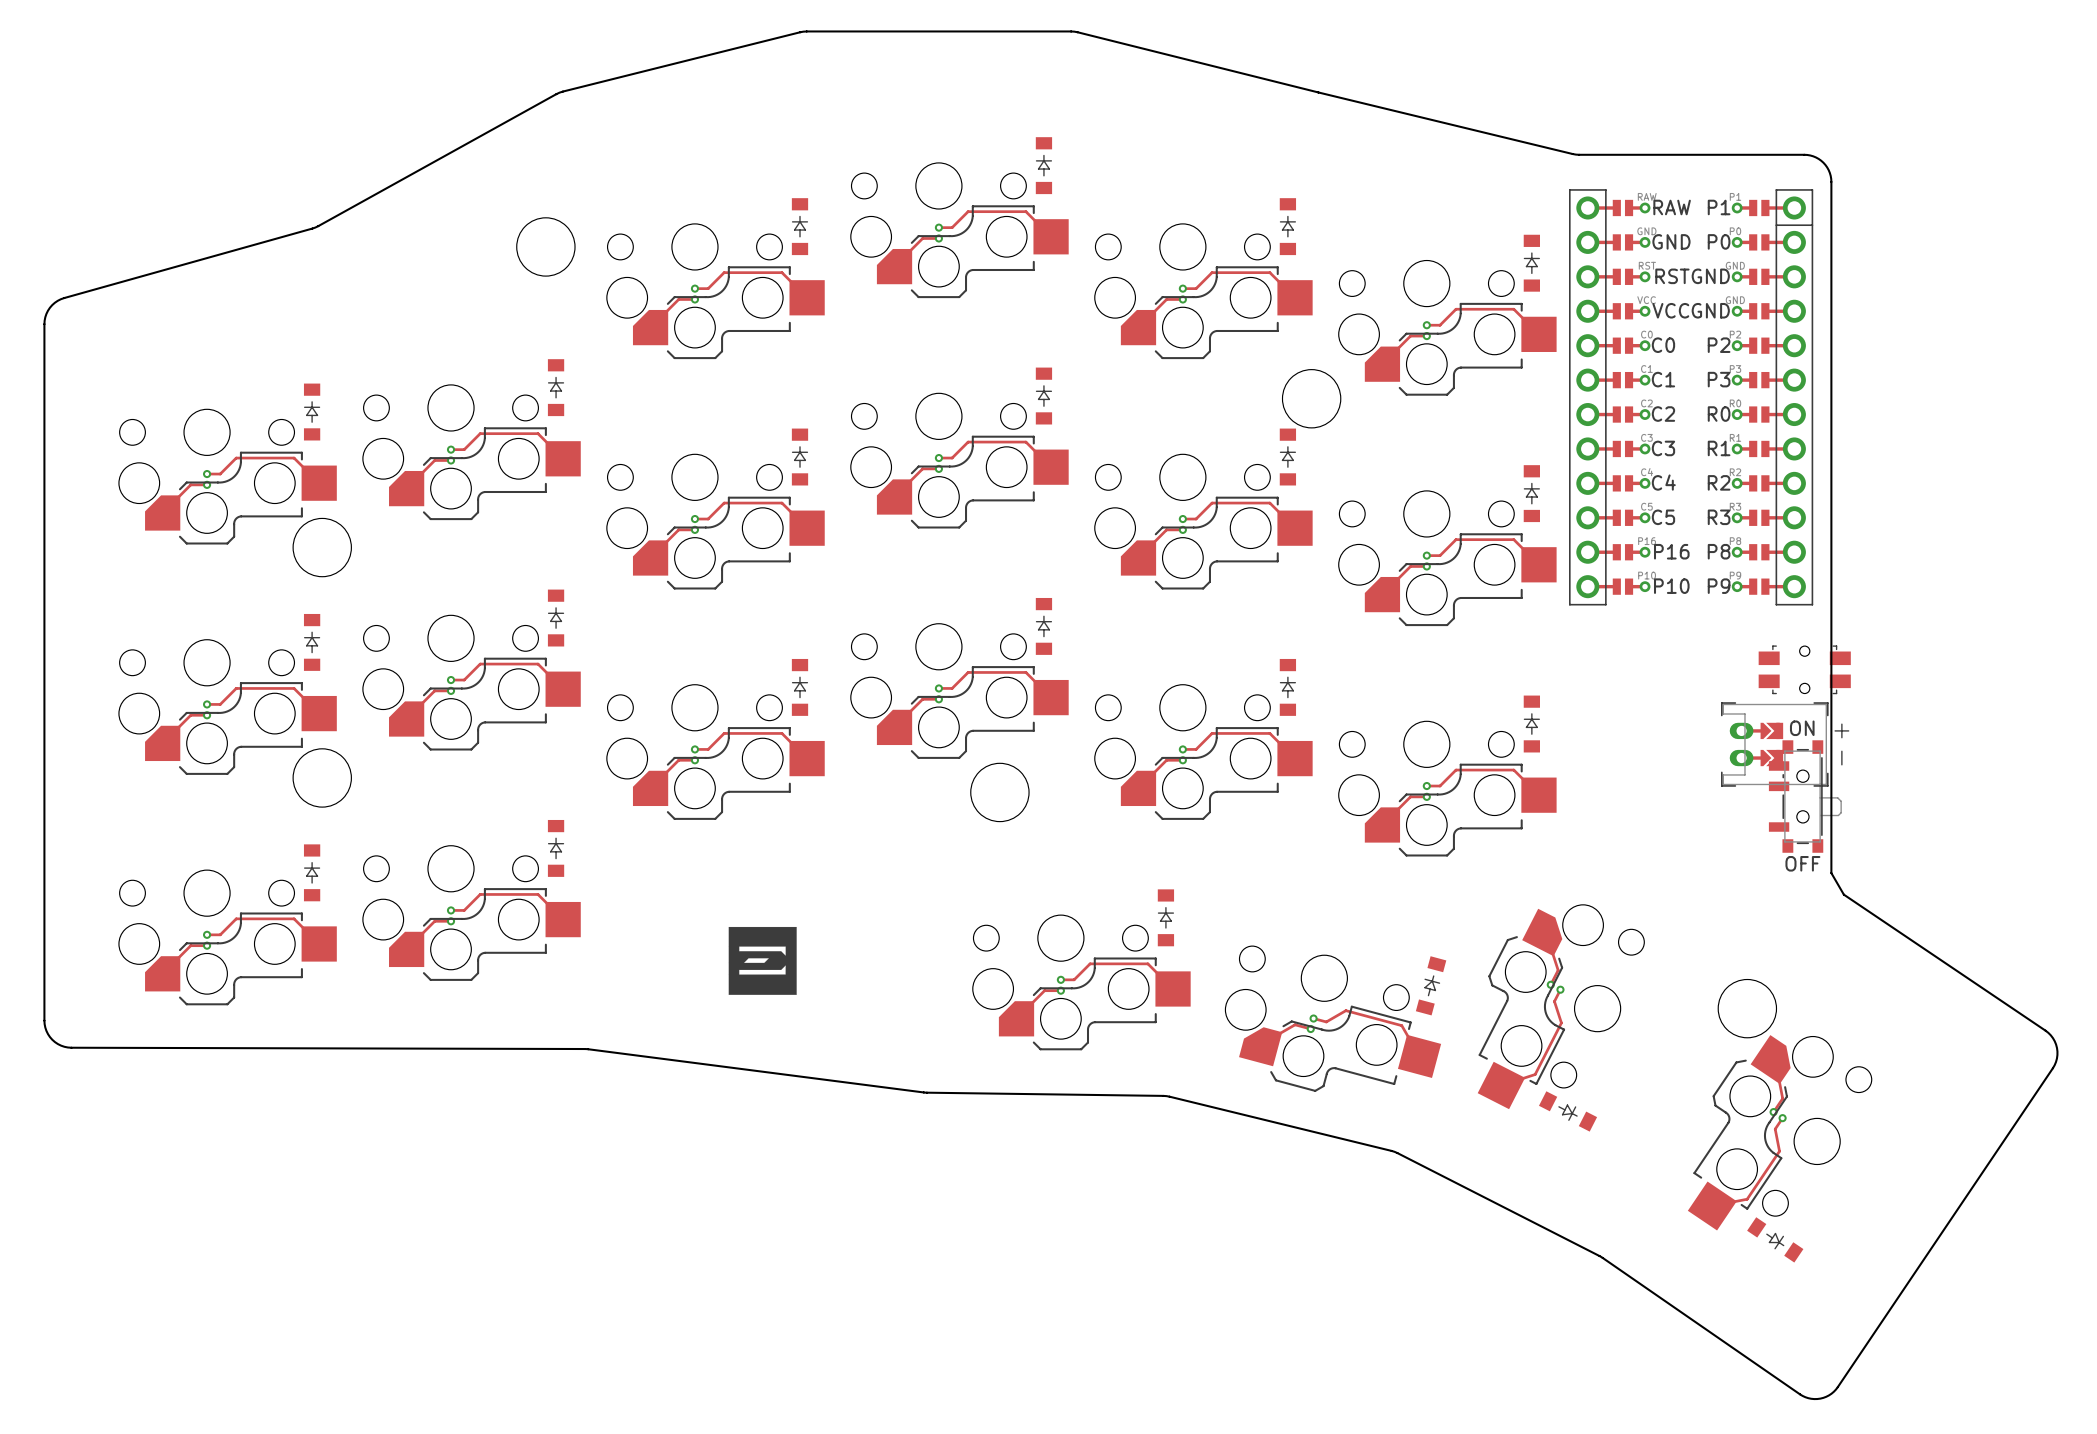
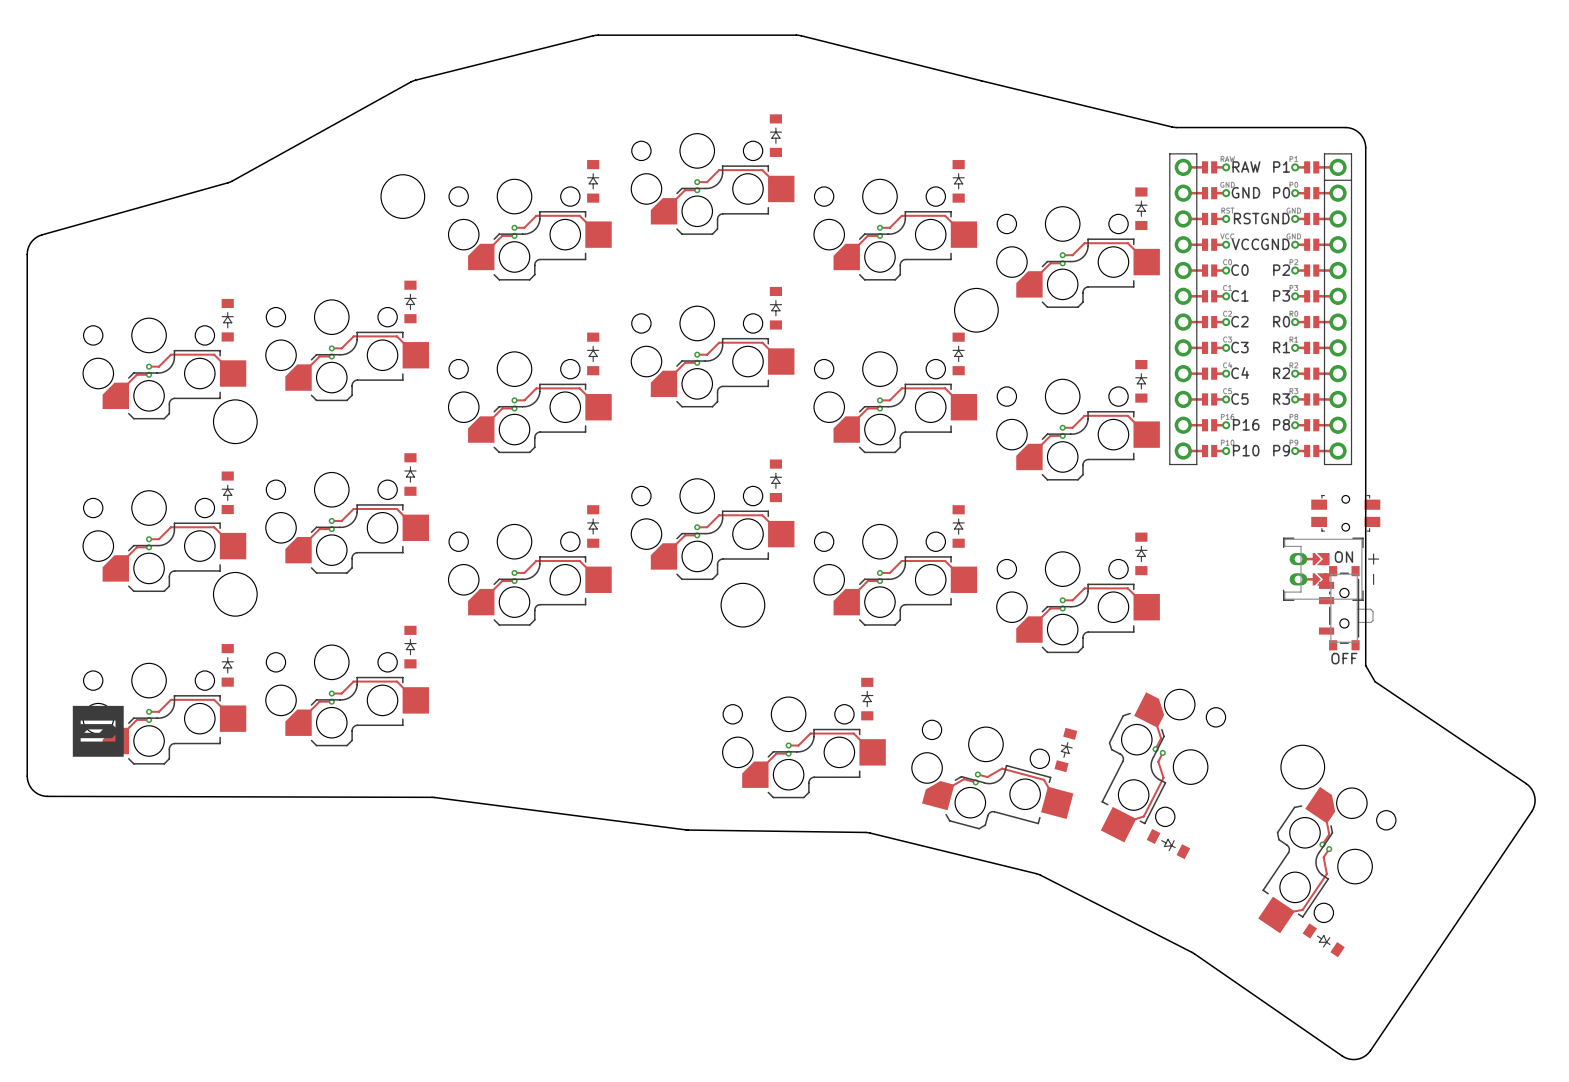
drawing: none -> [72, 705, 124, 757]
drawing: [728, 926, 797, 995] -> none

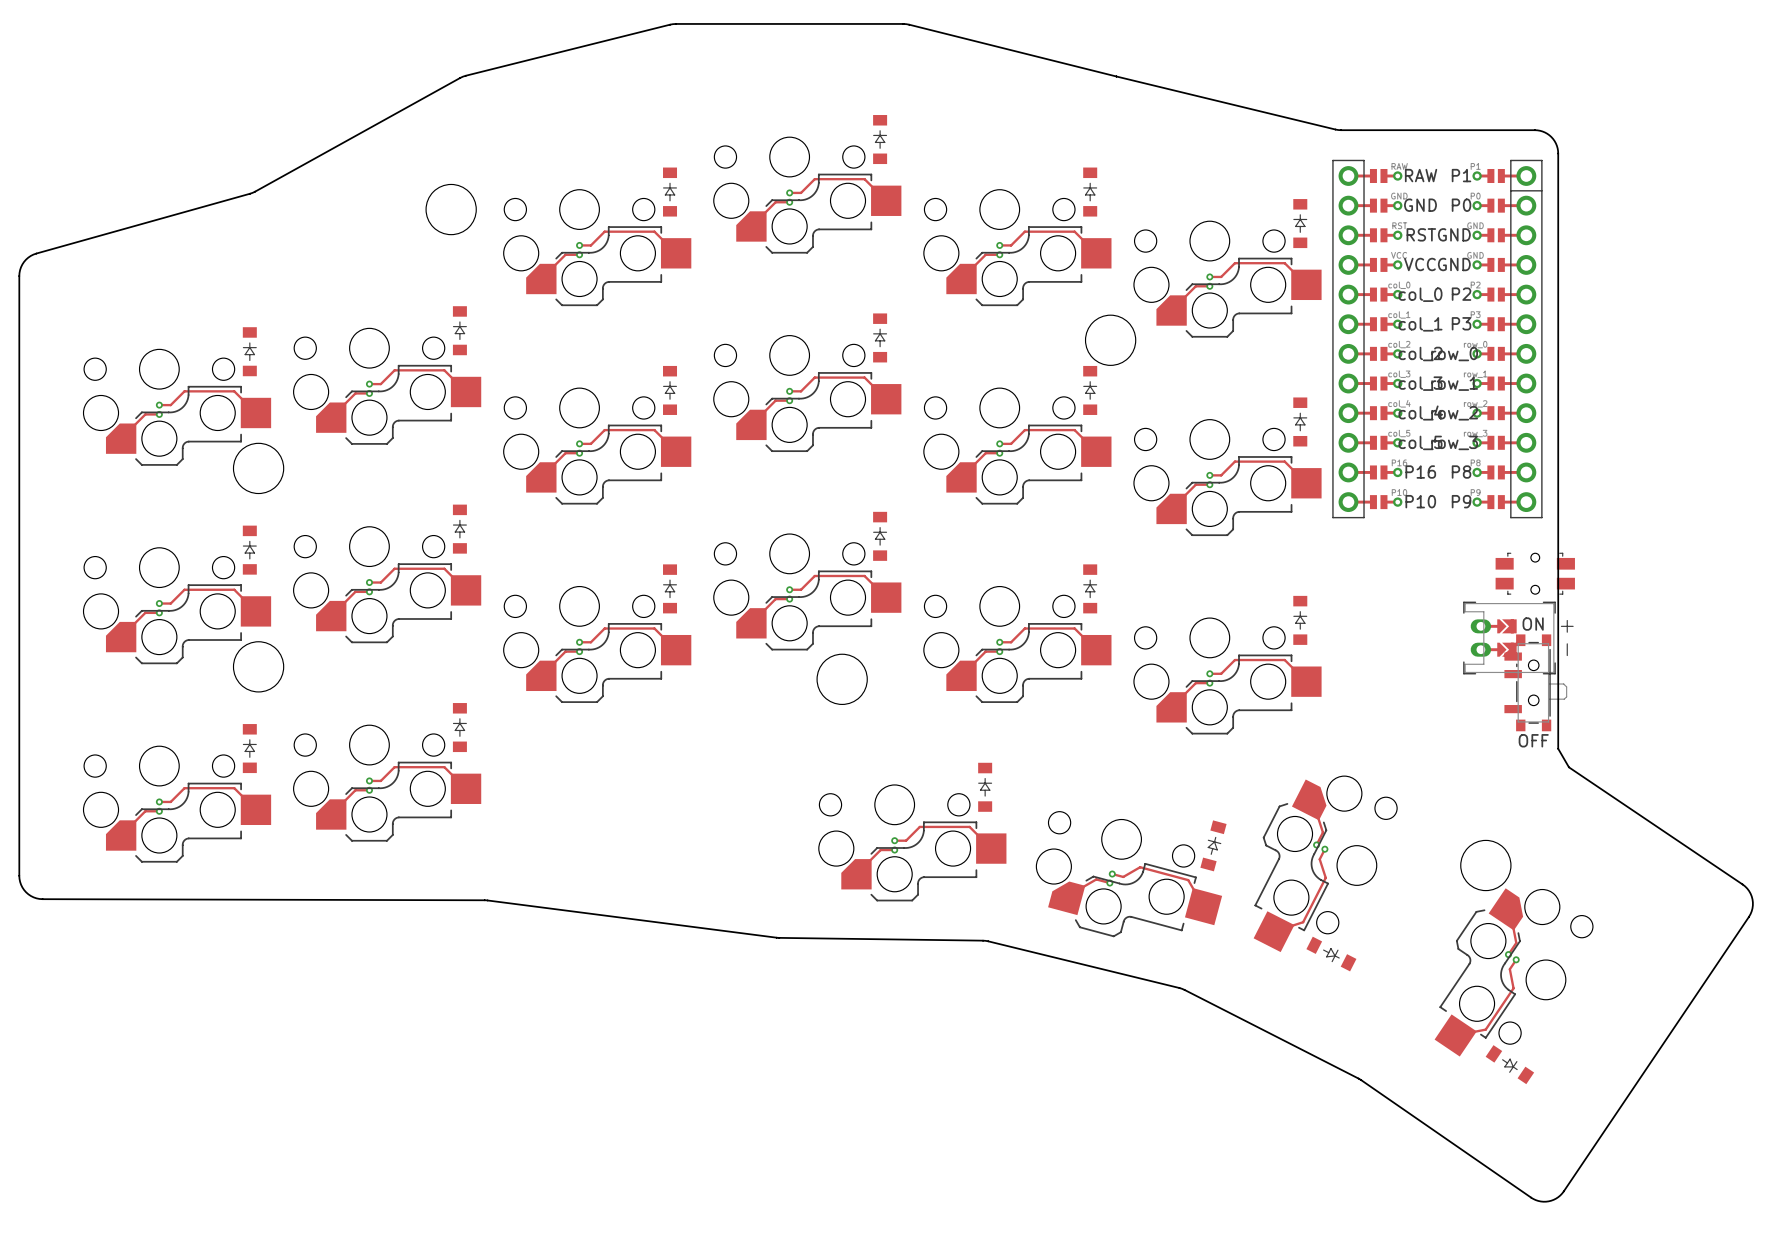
part footprint: [1169, 153, 1353, 466] -> [1332, 159, 1543, 519]
drawing: [72, 705, 124, 757] -> none

